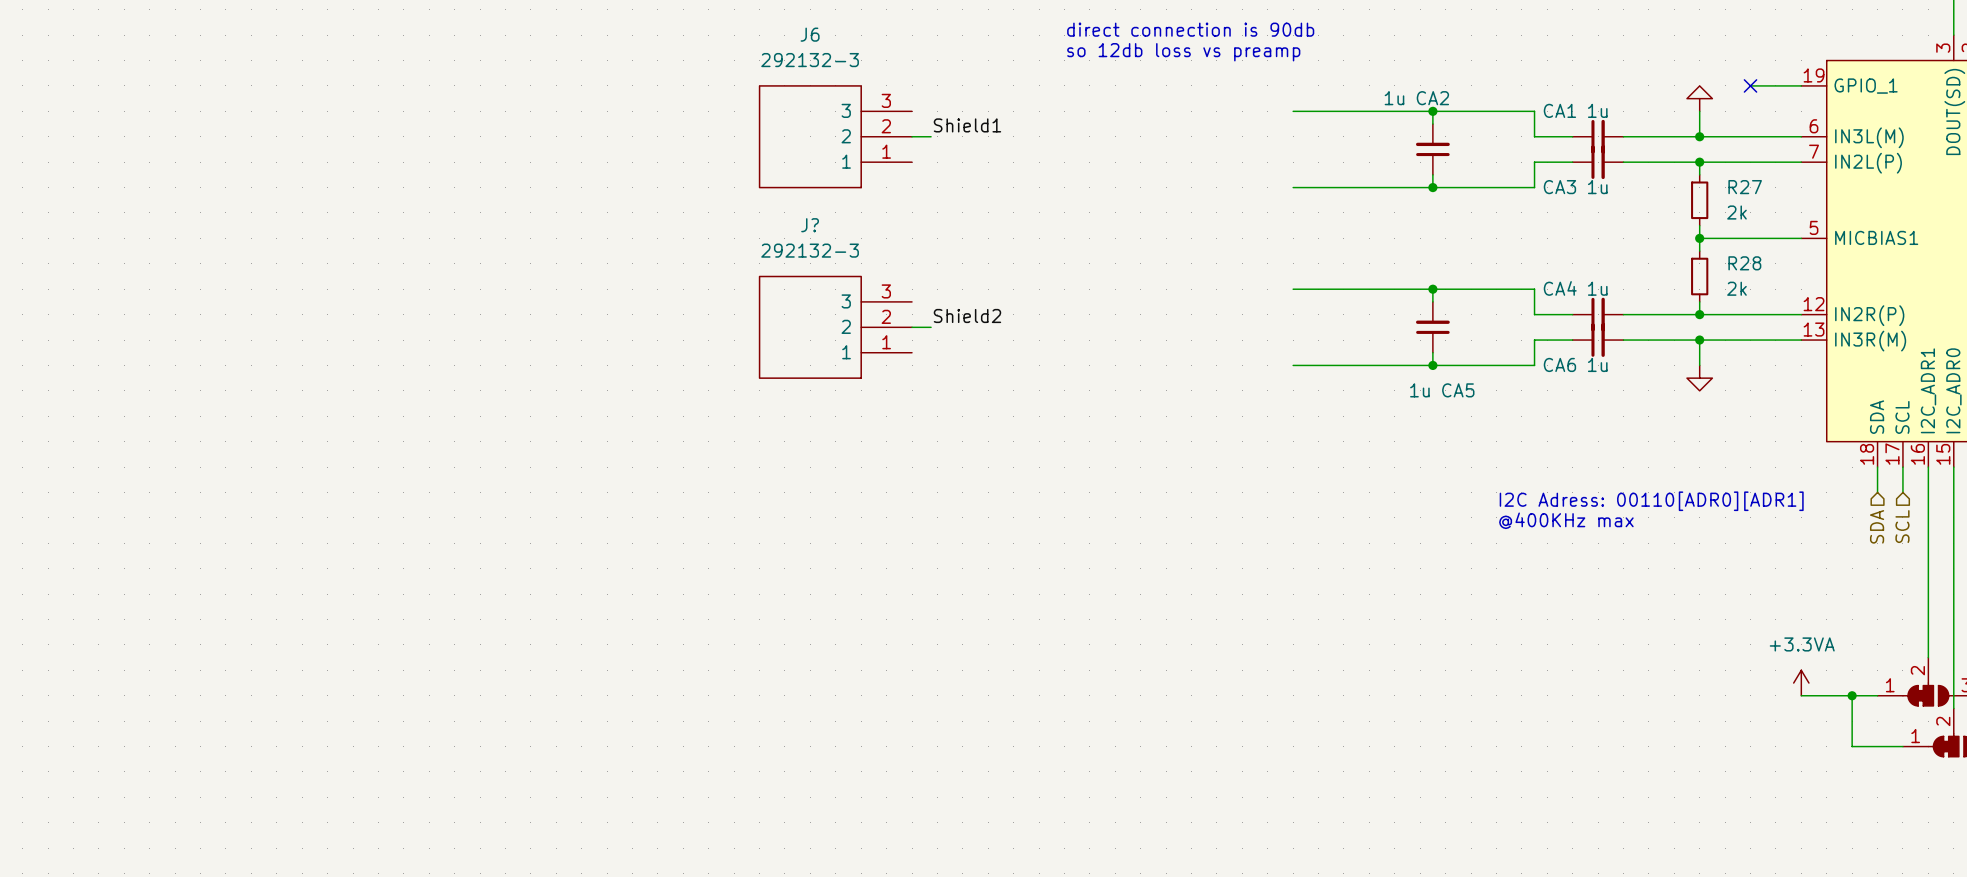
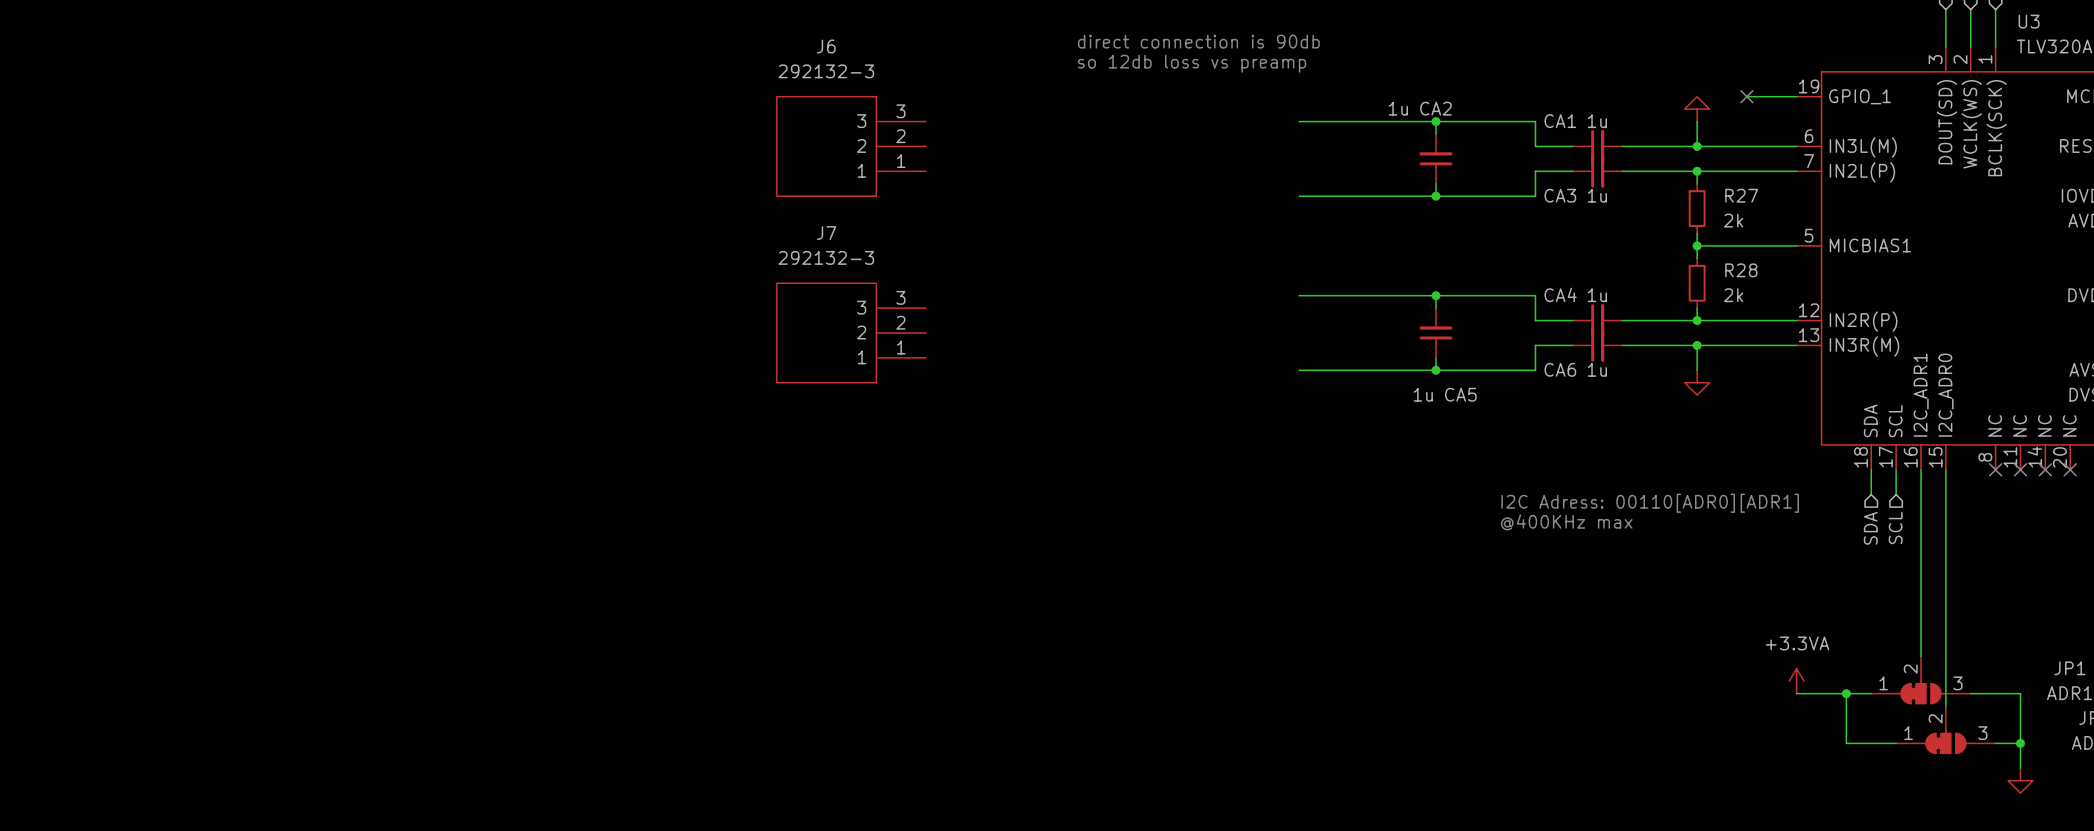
label: Shield1 (967, 125) -> none
wire: (912, 136) (931, 136) -> none
J? name: J? (810, 225) -> J7 (826, 233)
label: Shield2 (967, 315) -> none
wire: (912, 327) (931, 327) -> none

